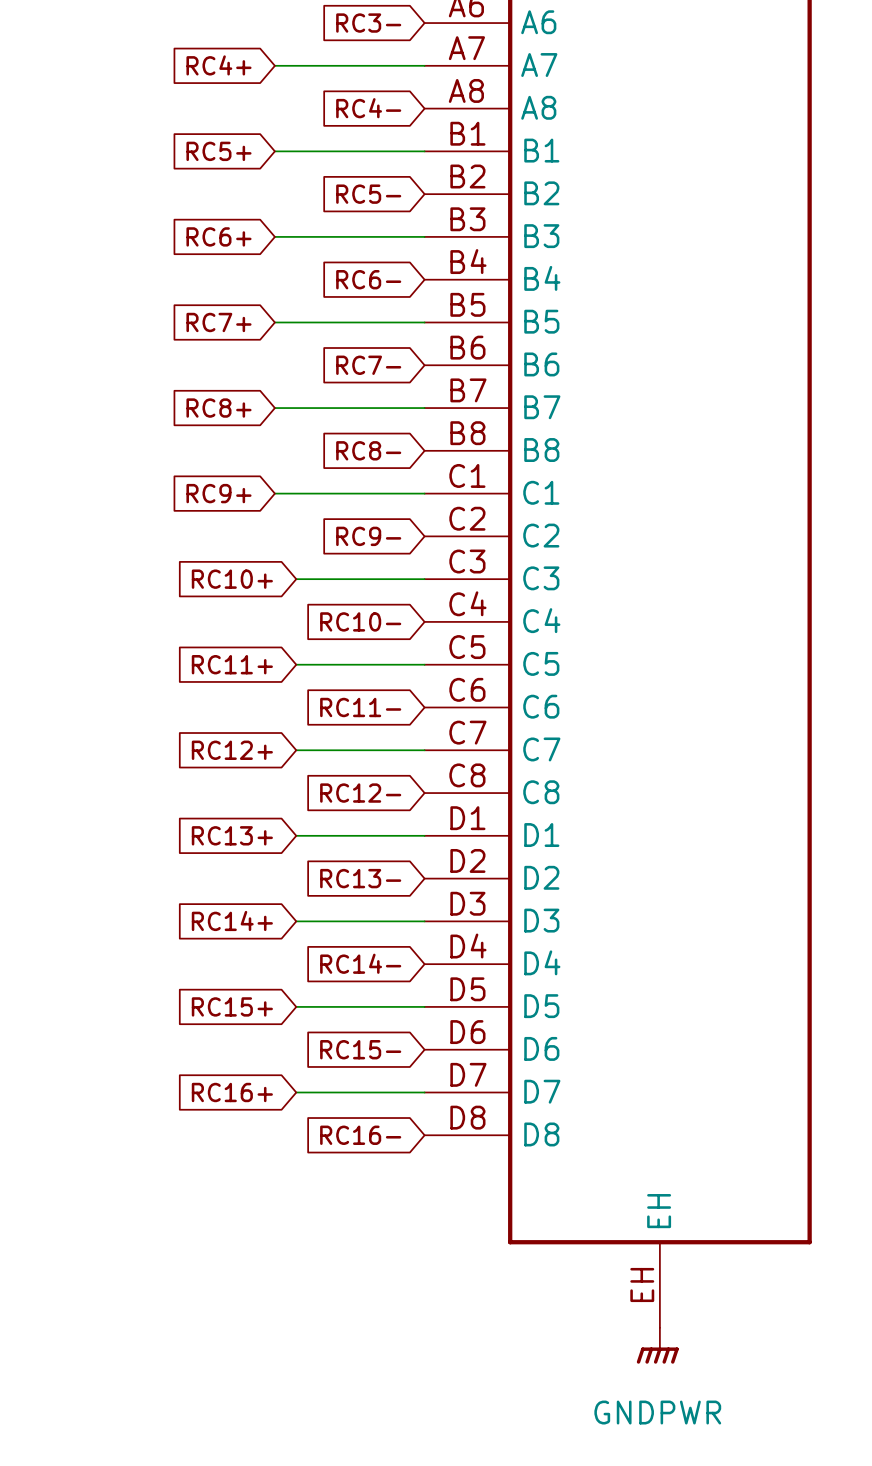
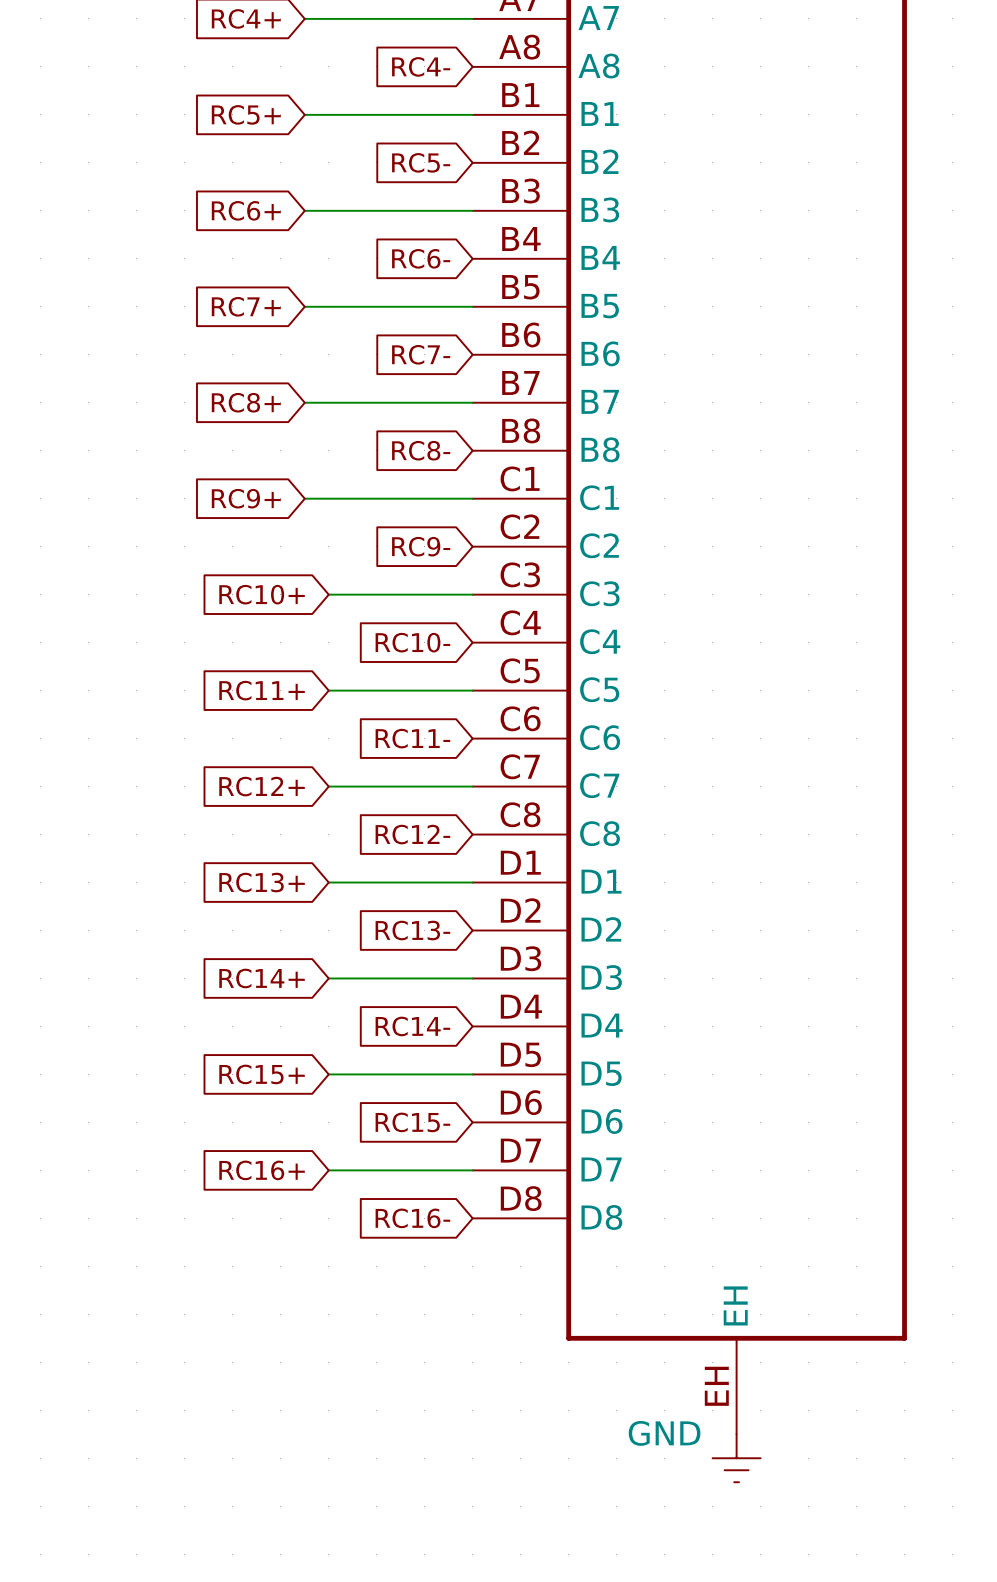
power symbol: GNDPWR (657, 1345) -> GND (736, 1458)

